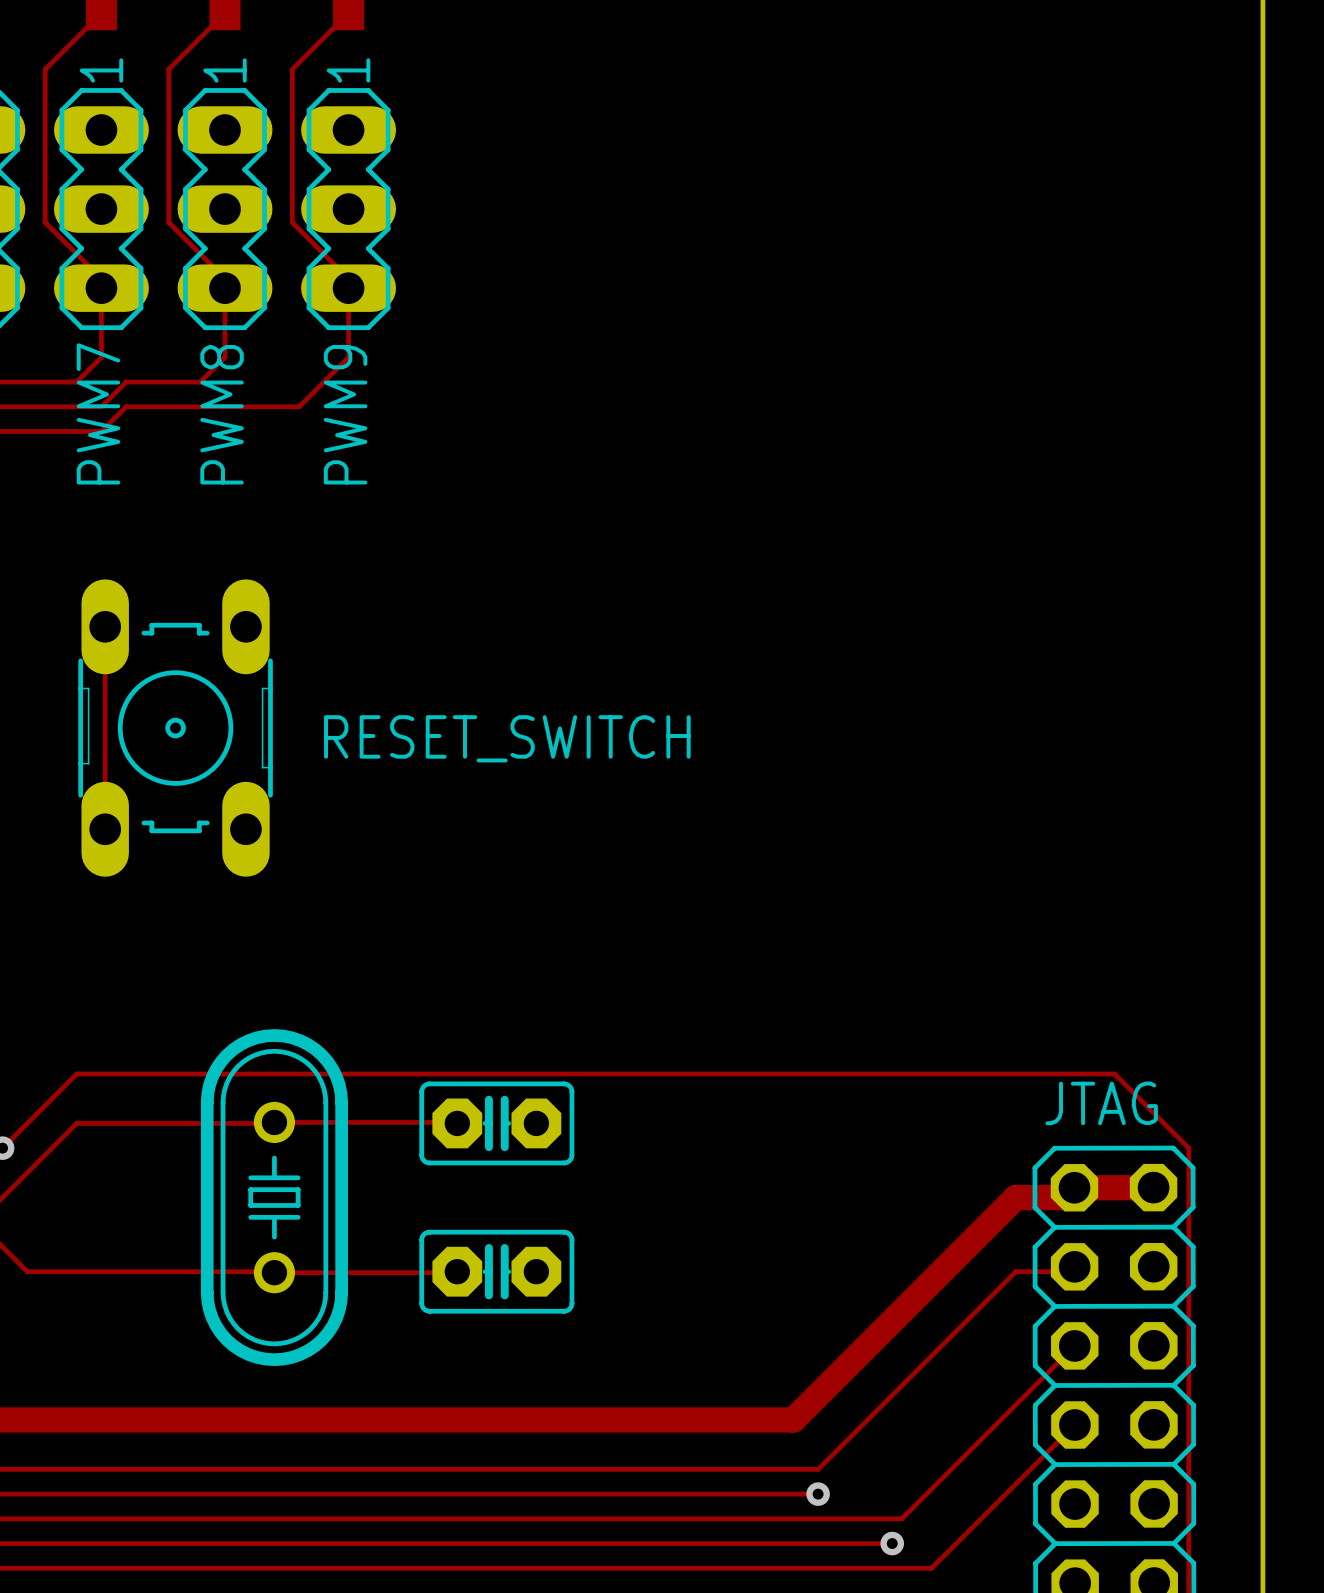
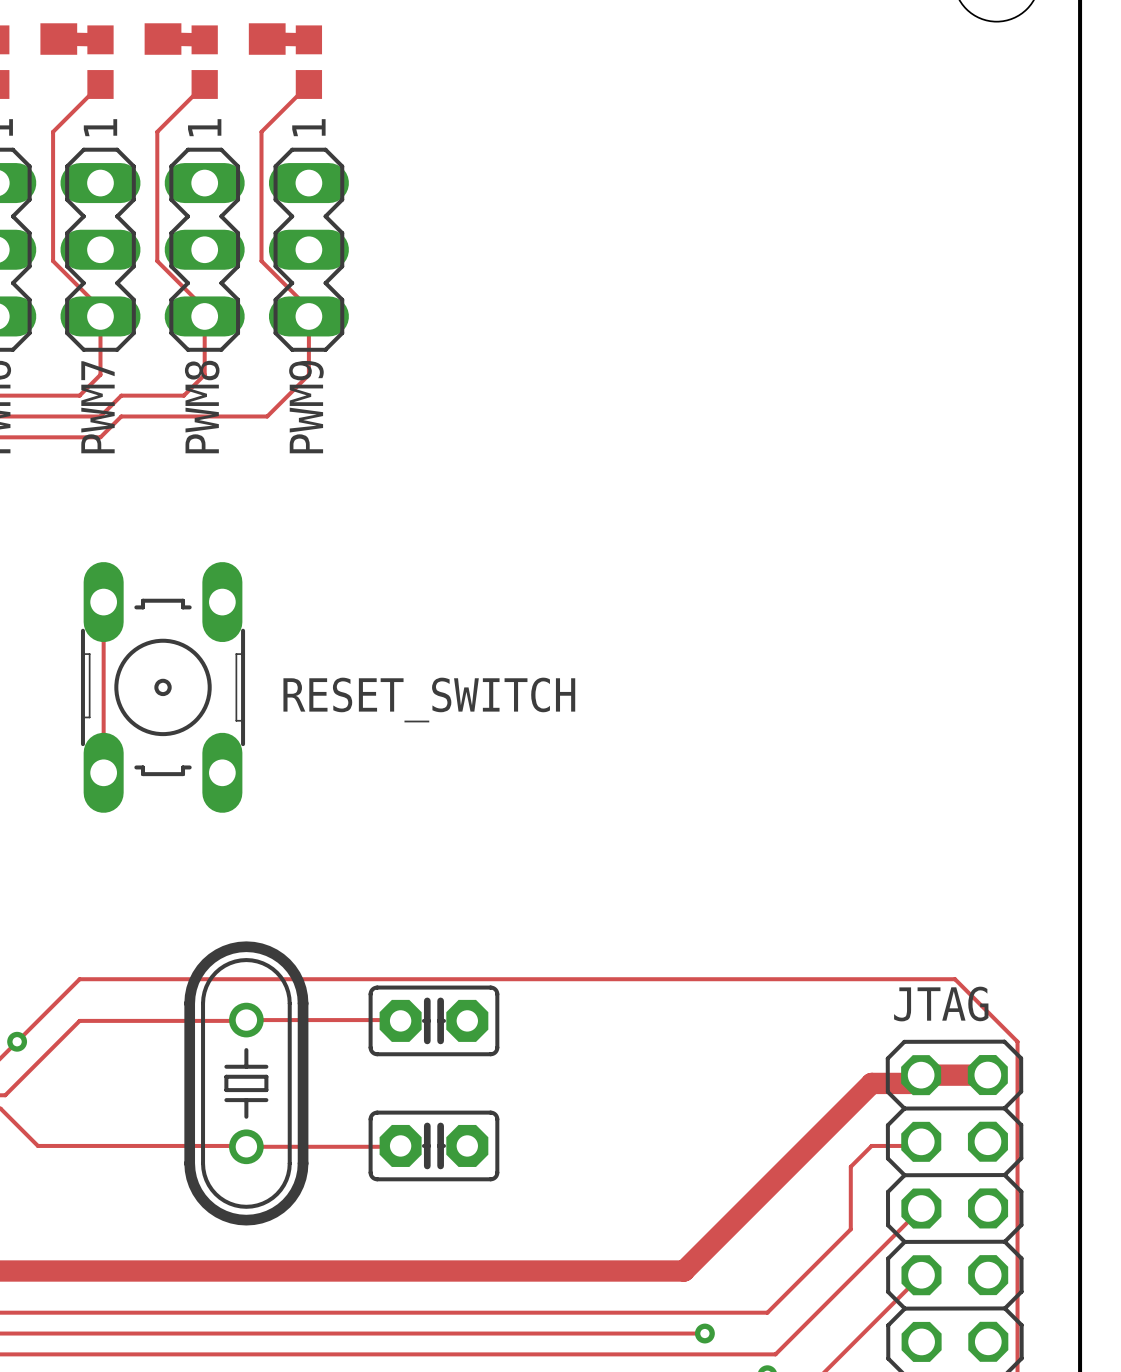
track: (991, 1296) (818, 1469) -> (850, 1166) (850, 1229) (767, 1312) (704, 1312)

